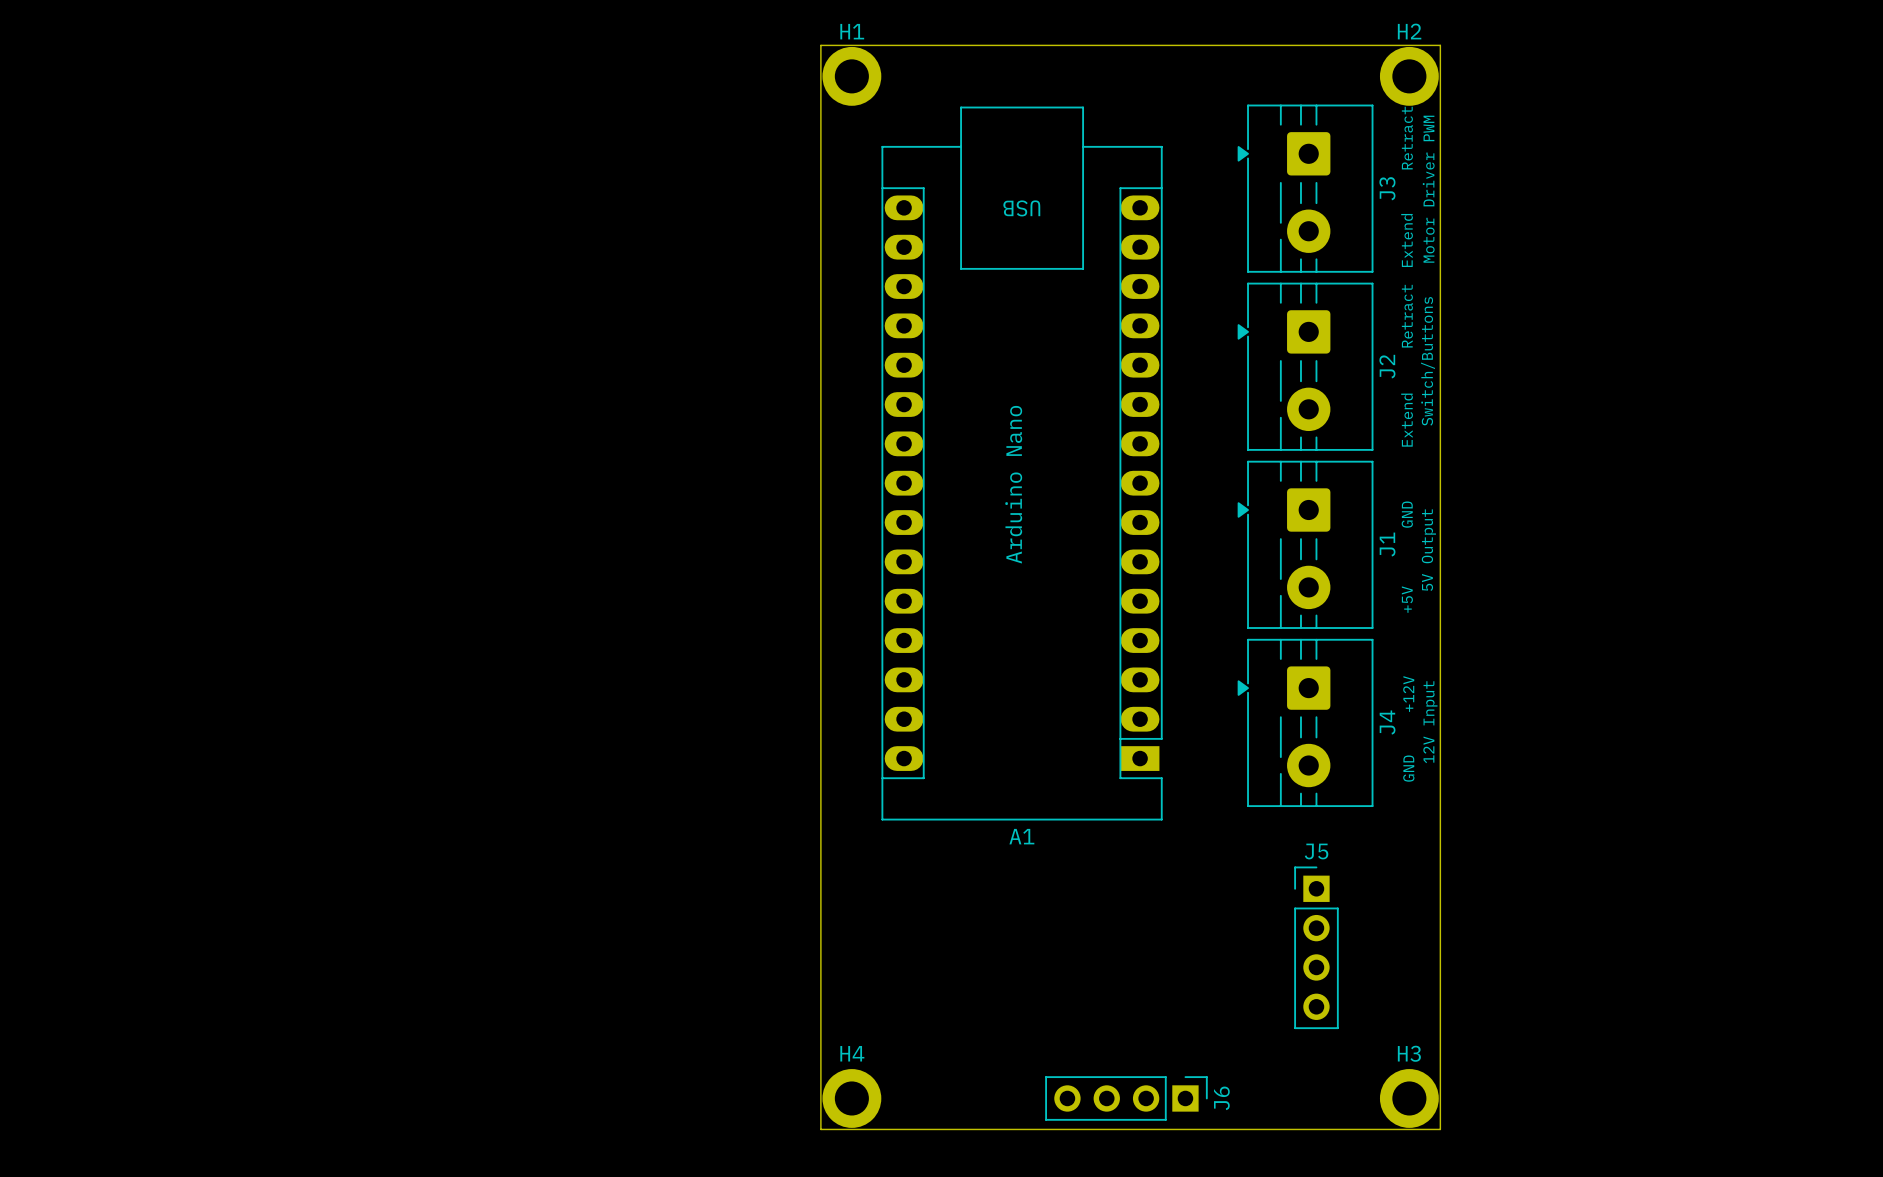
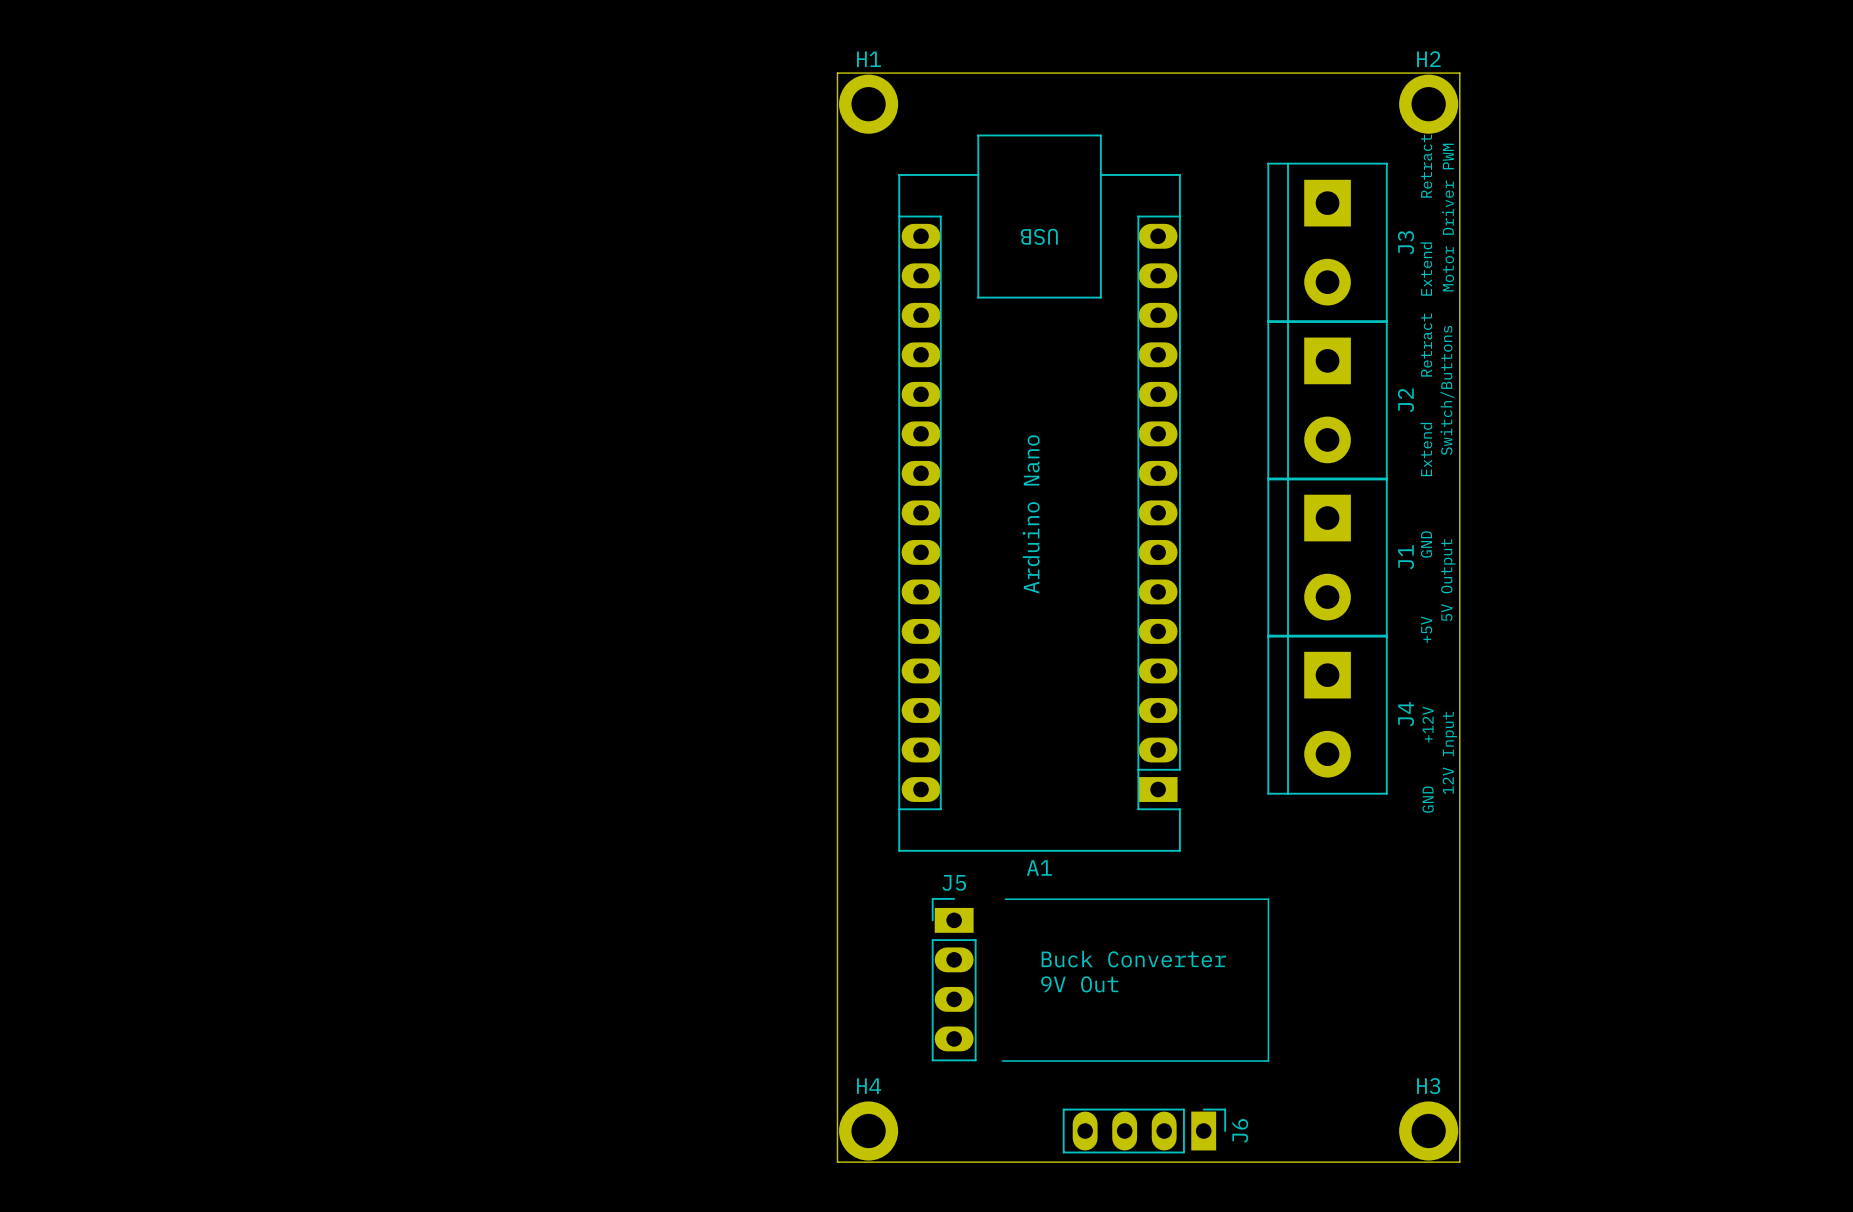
J3 footprint: [1237, 104, 1374, 273] -> [1267, 162, 1388, 323]
J2 footprint: [1237, 282, 1374, 451] -> [1267, 320, 1388, 481]
J1 footprint: [1237, 460, 1374, 629] -> [1267, 477, 1388, 638]
J4 footprint: [1237, 638, 1374, 808] -> [1267, 634, 1388, 795]
J5 footprint: [1294, 866, 1339, 1030] -> [931, 897, 977, 1062]
line: none -> (1005, 899) (1268, 899) (1268, 1061) (1002, 1061)
text: none -> Buck Converter (1133, 959)
text: none -> 9V Out (1079, 984)
J6 footprint: [1045, 1076, 1208, 1121] -> [1062, 1108, 1227, 1154]

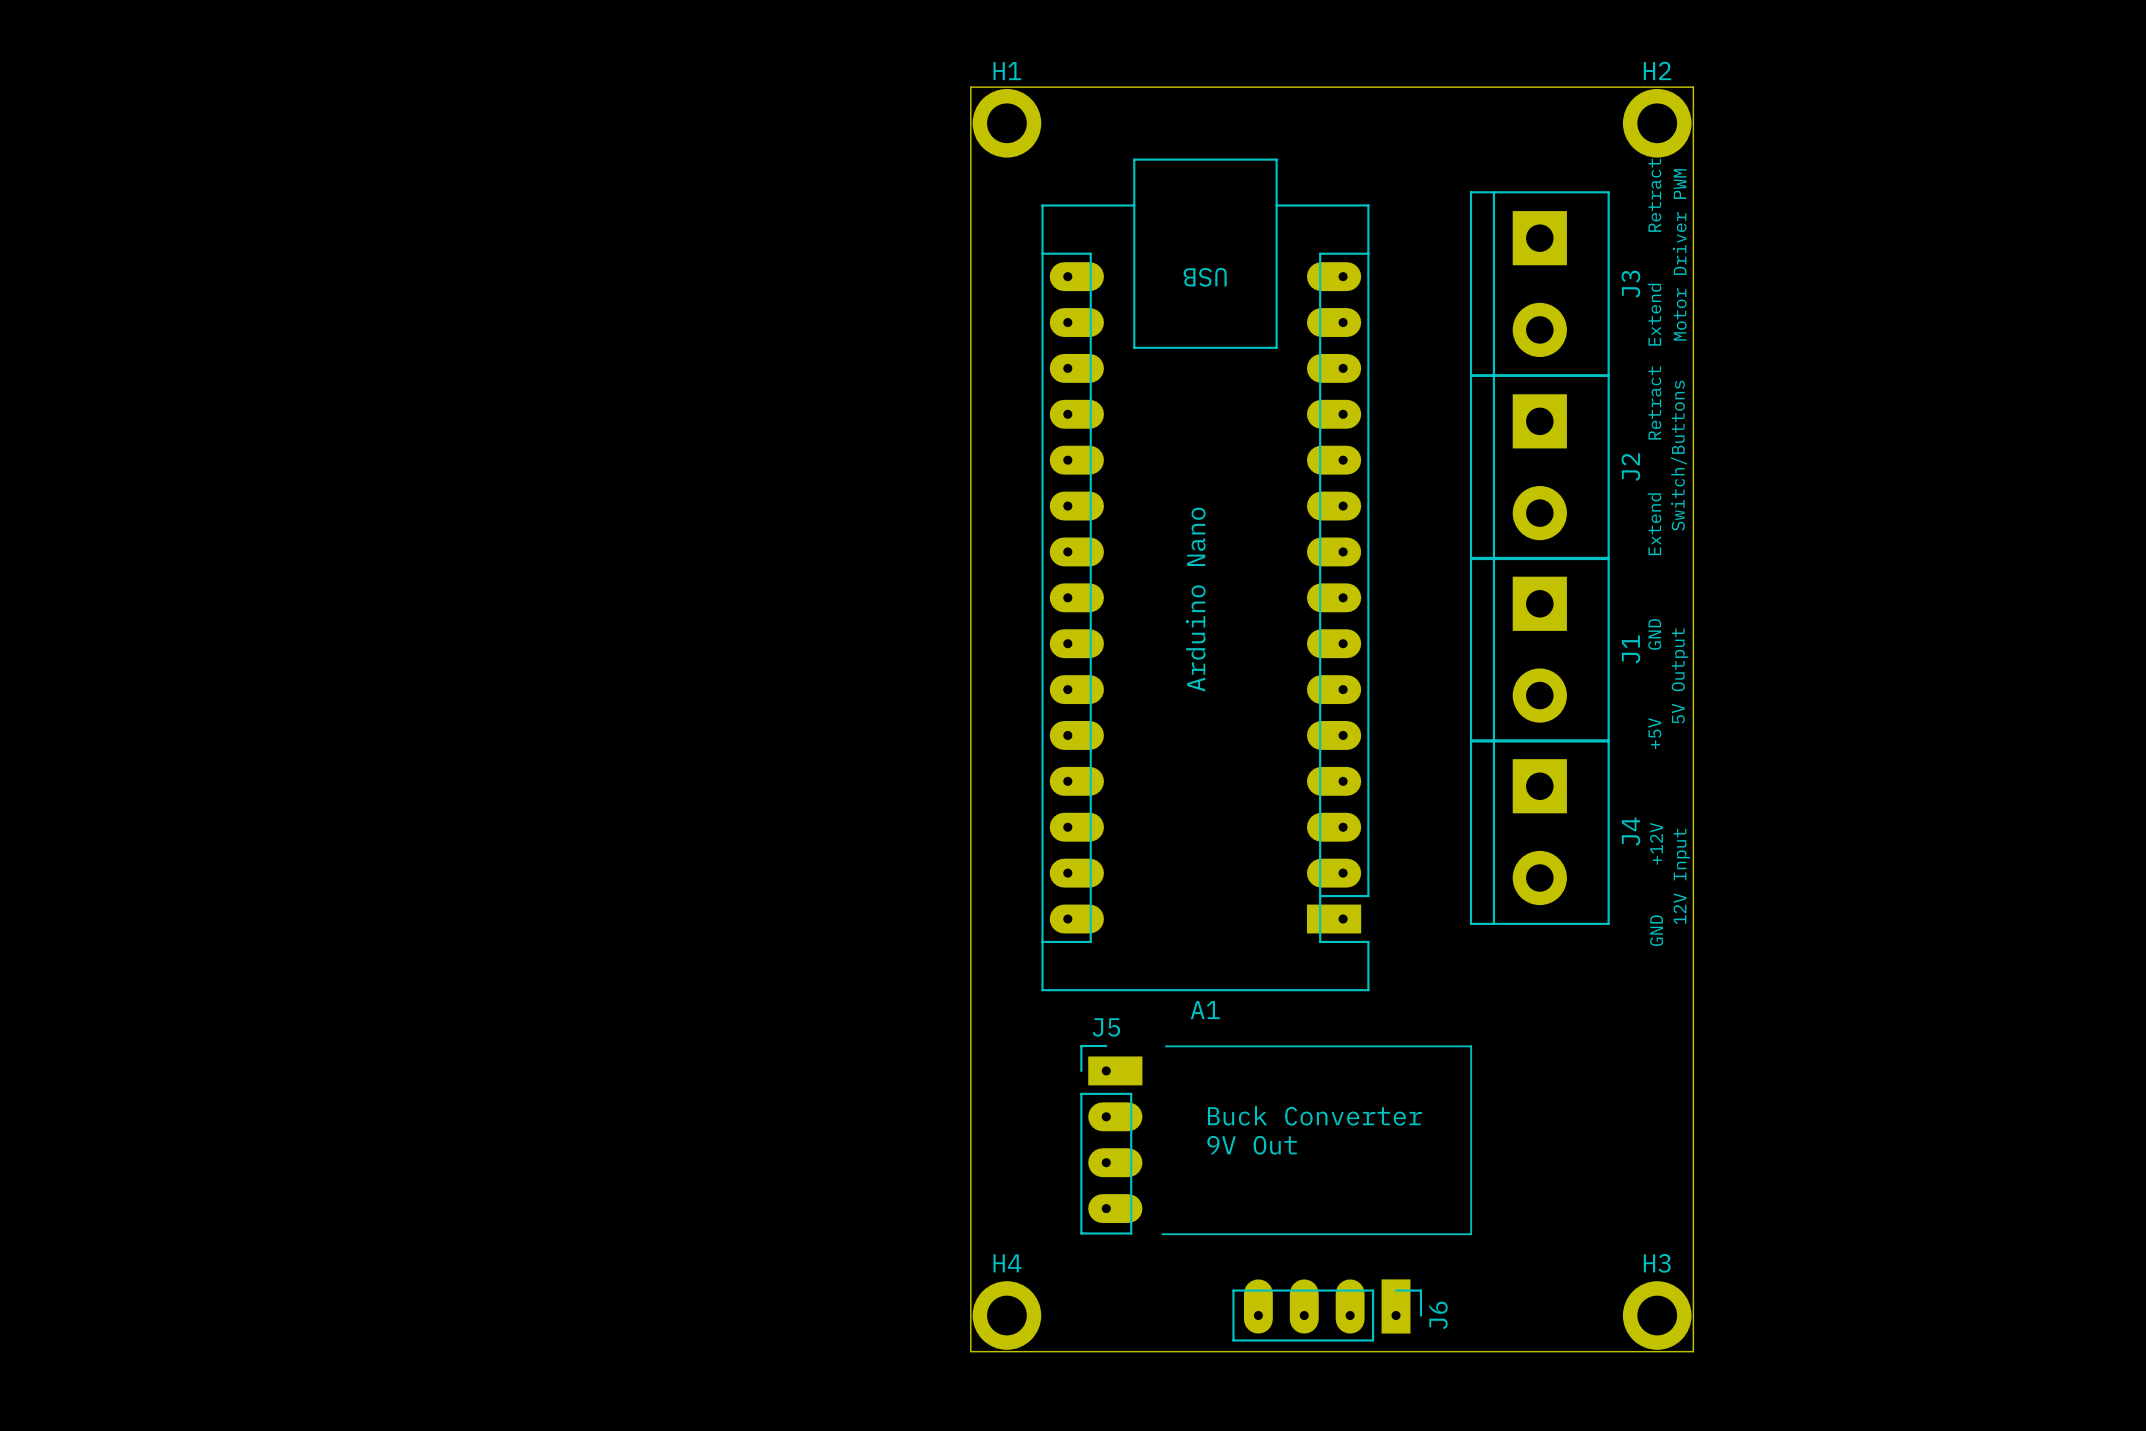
A1 footprint: [898, 134, 1181, 852] -> [1041, 158, 1370, 992]
J5 footprint: [931, 897, 977, 1062] -> [1080, 1044, 1143, 1235]
J6 footprint: [1062, 1108, 1227, 1154] -> [1232, 1279, 1423, 1342]

